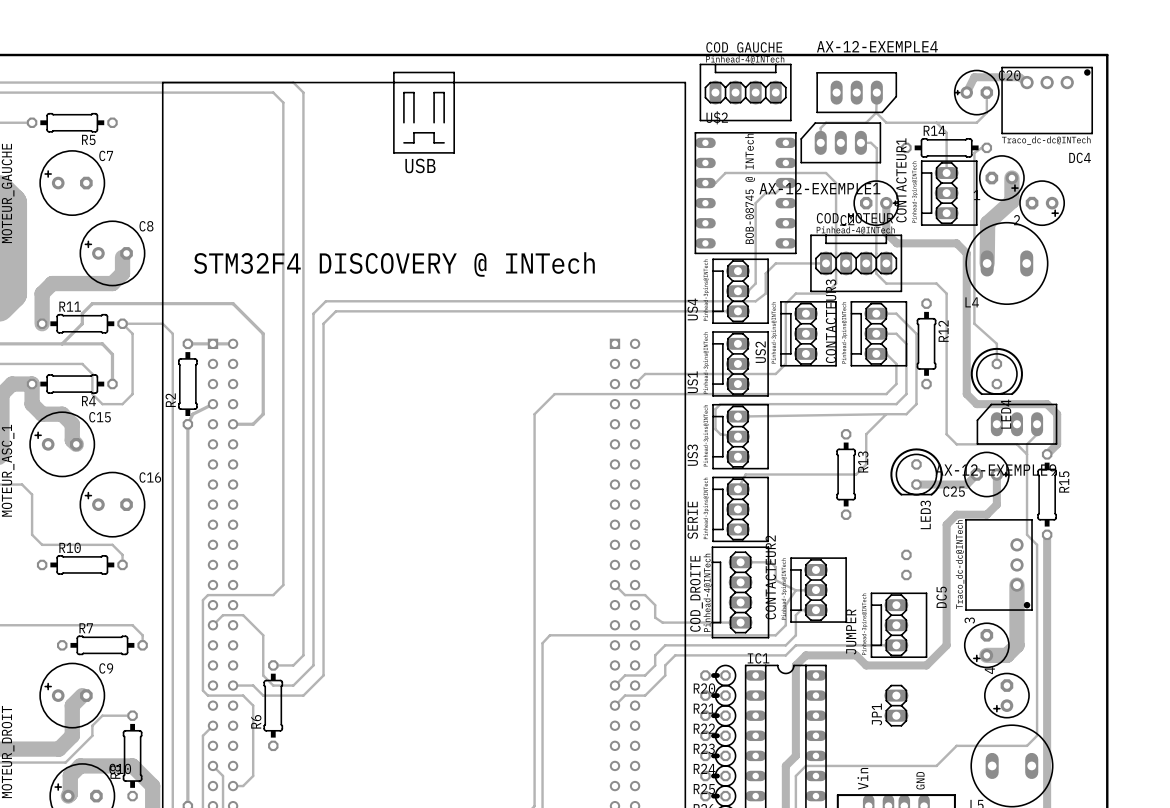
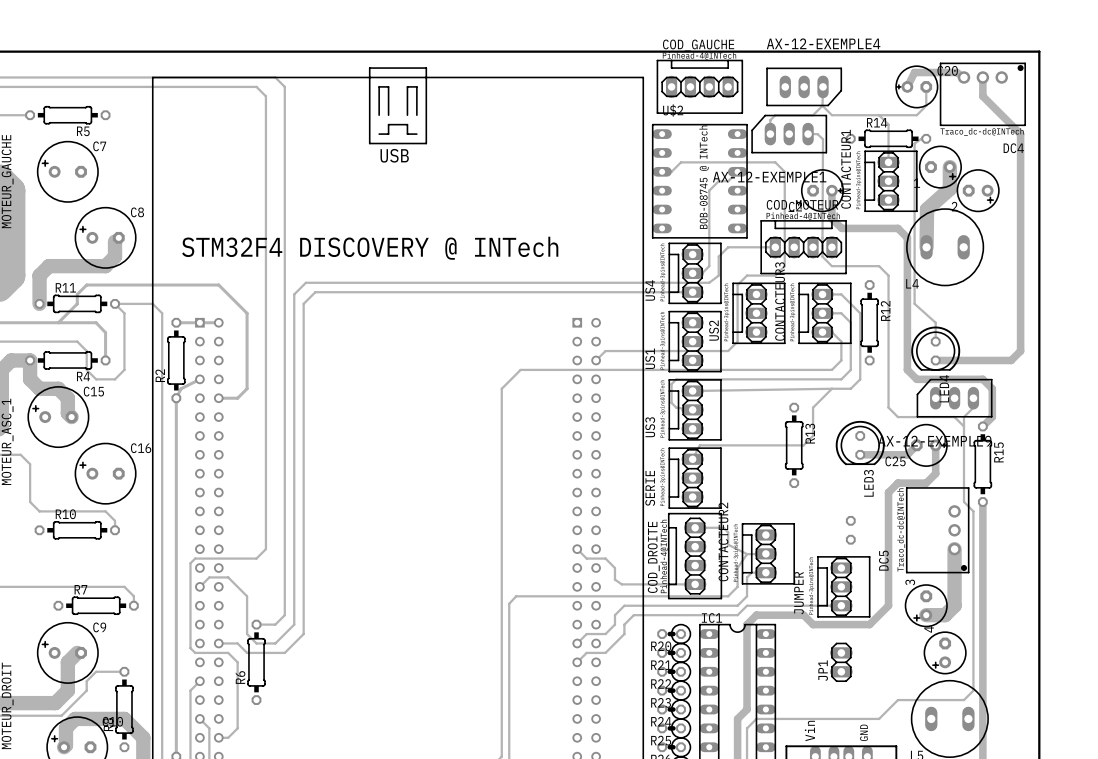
track: none -> (982, 77) (982, 96) (1020, 134) (1020, 351) (1011, 360) (935, 360)

